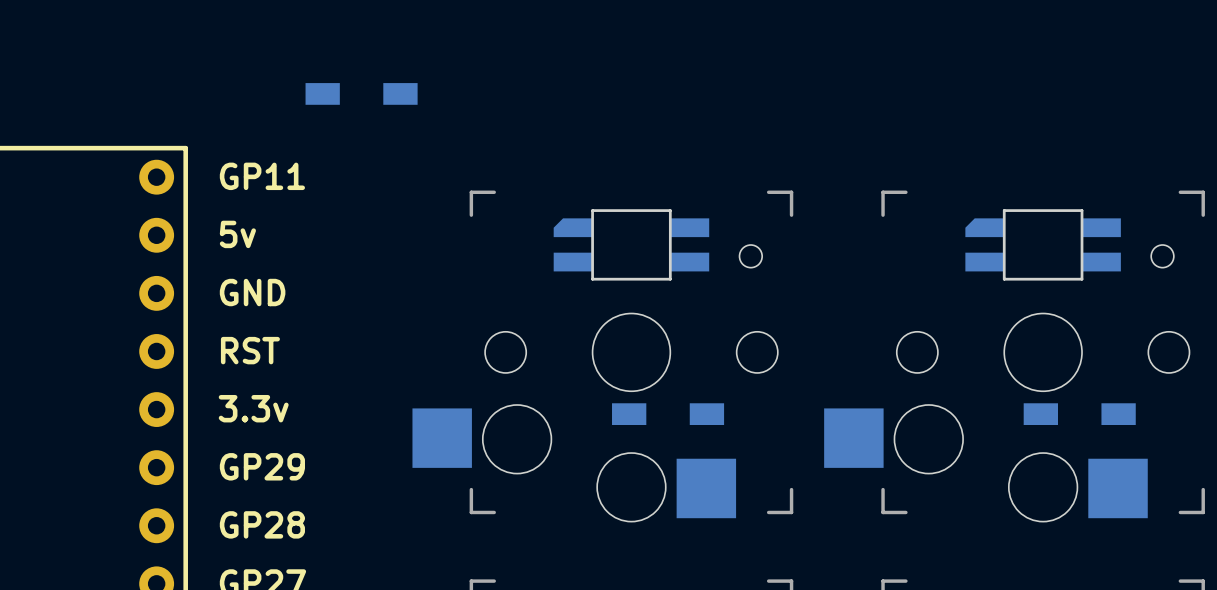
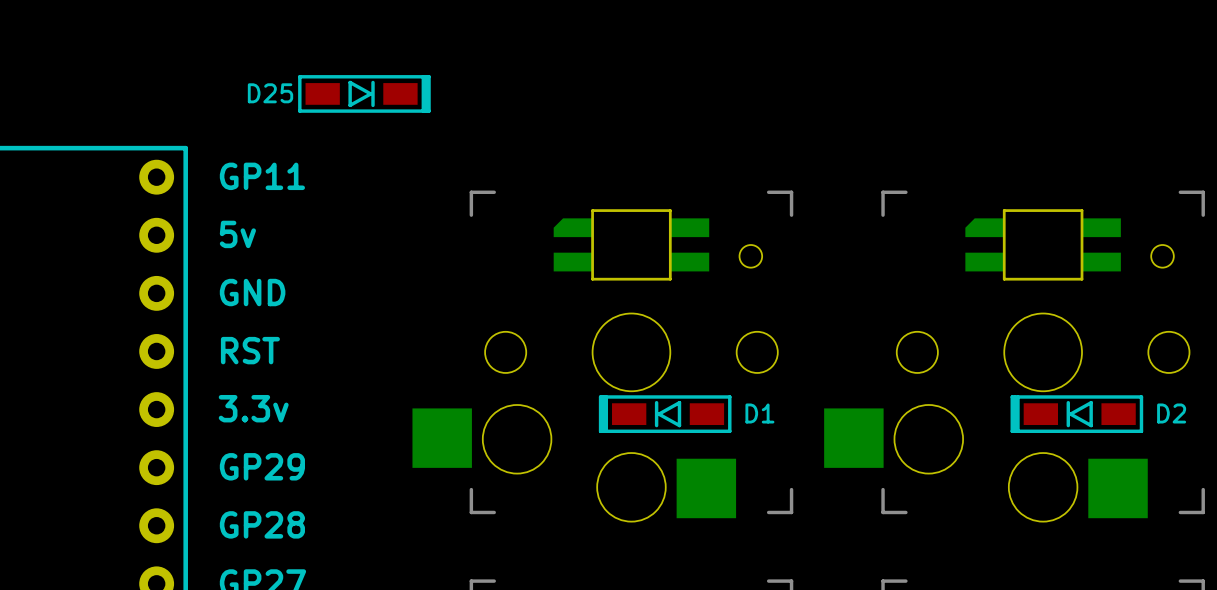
D25 side: bottom (361, 93) -> top (364, 93)
D1 side: bottom (668, 414) -> top (665, 414)
D2 side: bottom (1079, 414) -> top (1076, 414)

